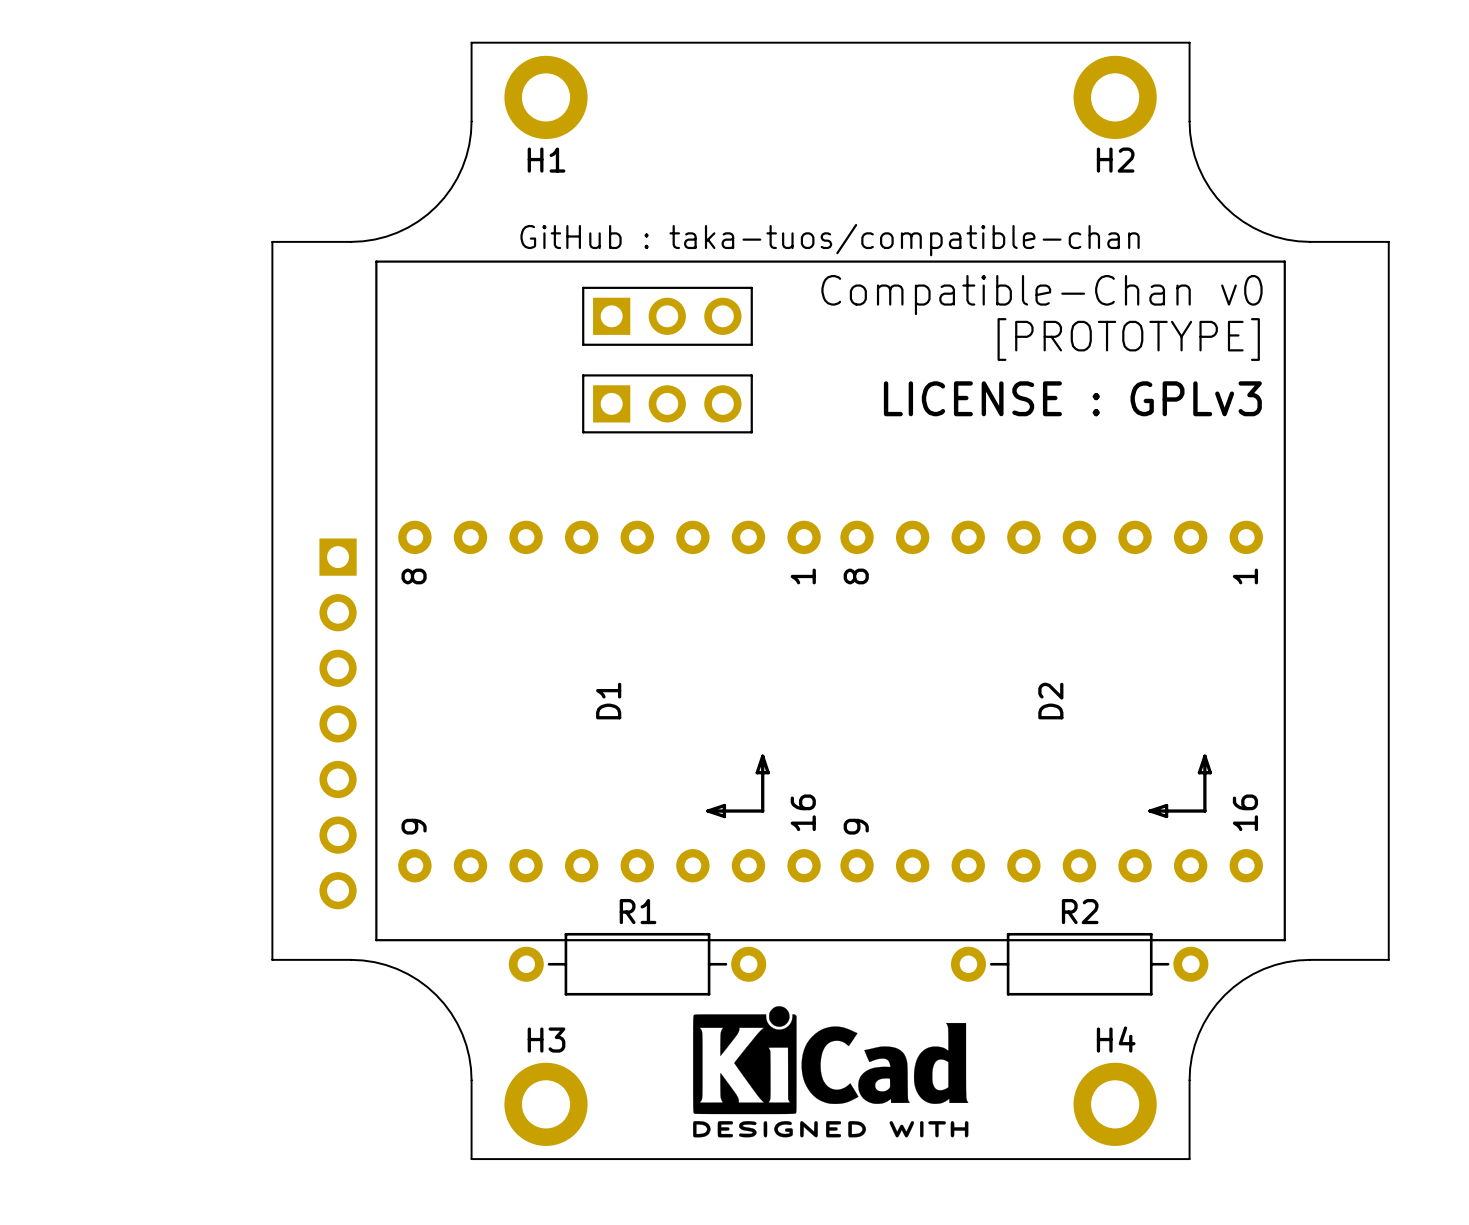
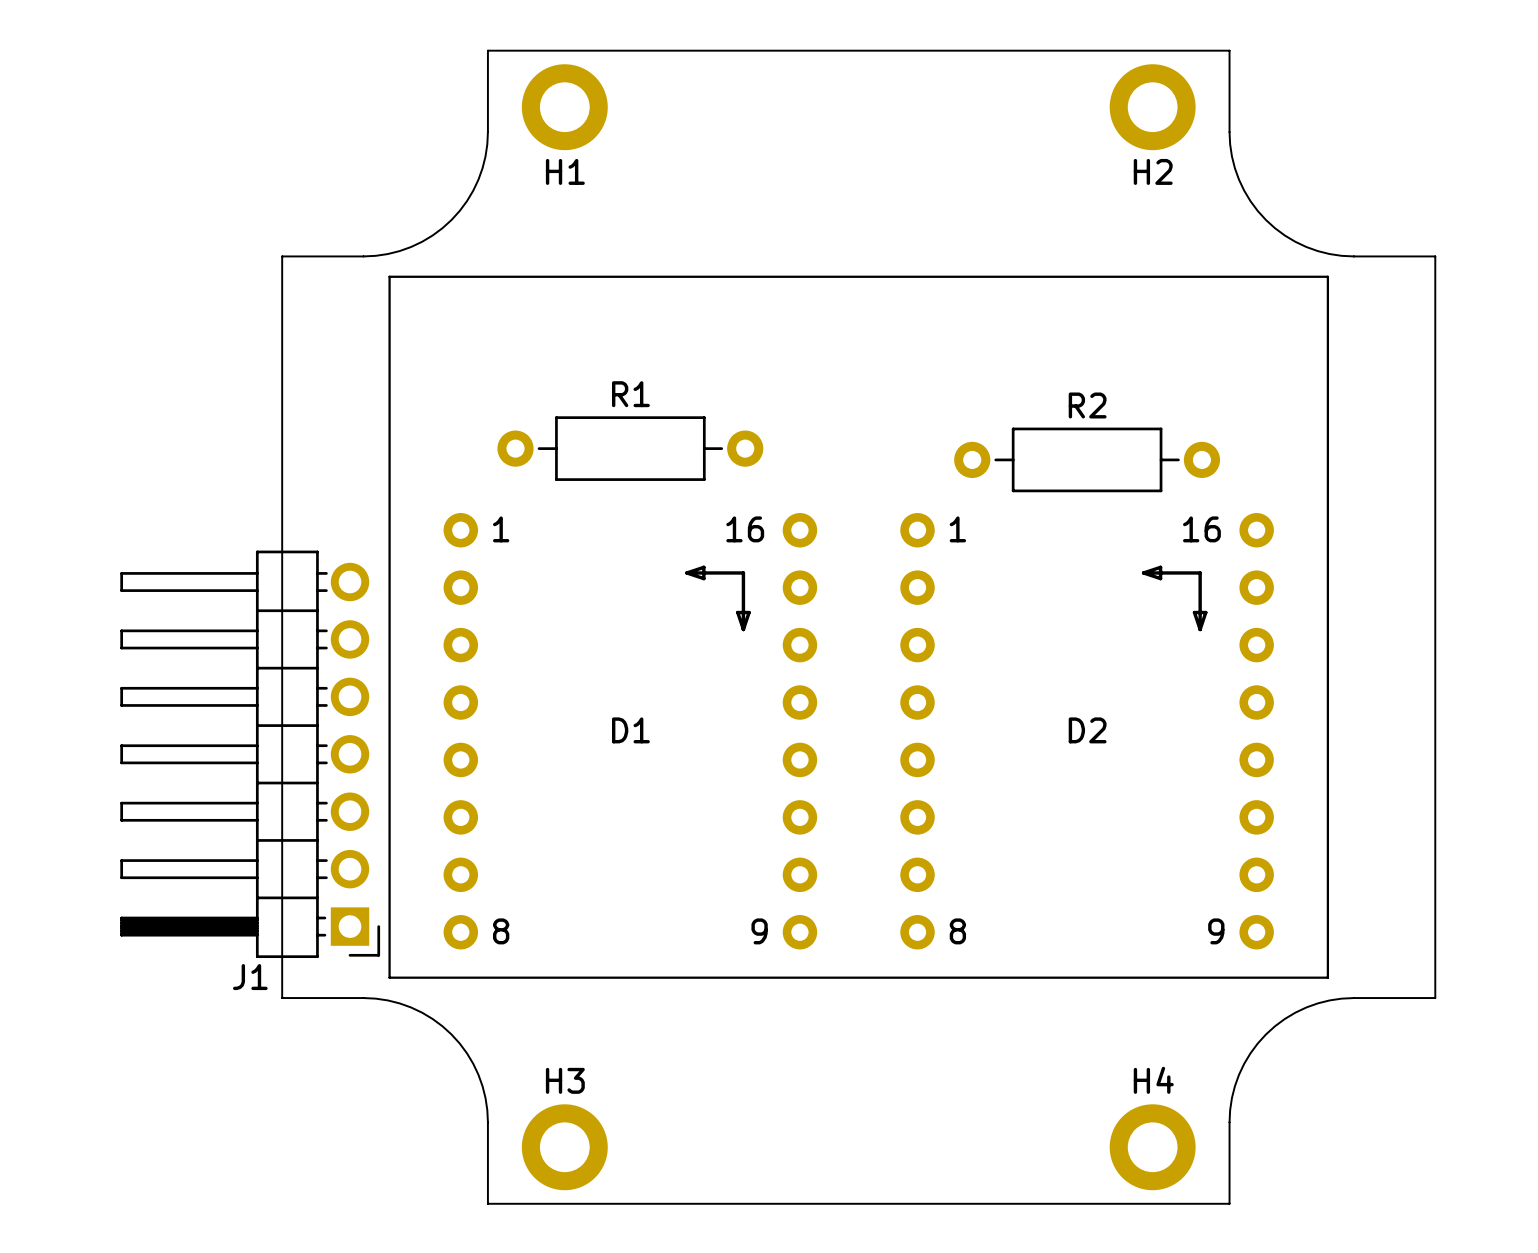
text: GitHub : taka-tuos/compatible-chan (830, 240) -> none
line: (583, 287) (583, 344) (751, 344) (751, 287) (583, 287) -> none
text: Compatible-Chan v0 (1041, 295) -> none
part: (667, 316) -> none
text: [PROTOTYPE] (1128, 339) -> none
line: (583, 375) (751, 375) (751, 432) (583, 432) (583, 375) -> none
text: LICENSE : GPLv3 (1072, 398) -> none
part: (667, 403) -> none
D1 rotation: 0° (609, 701) -> 90° counterclockwise (630, 731)
D2 rotation: 0° (1051, 701) -> 90° counterclockwise (1087, 731)
J1 side: bottom (338, 723) -> top (250, 754)
R1 position: (637, 964) -> (630, 448)
R2 position: (1079, 964) -> (1087, 459)
drawing: [693, 1006, 969, 1138] -> none

